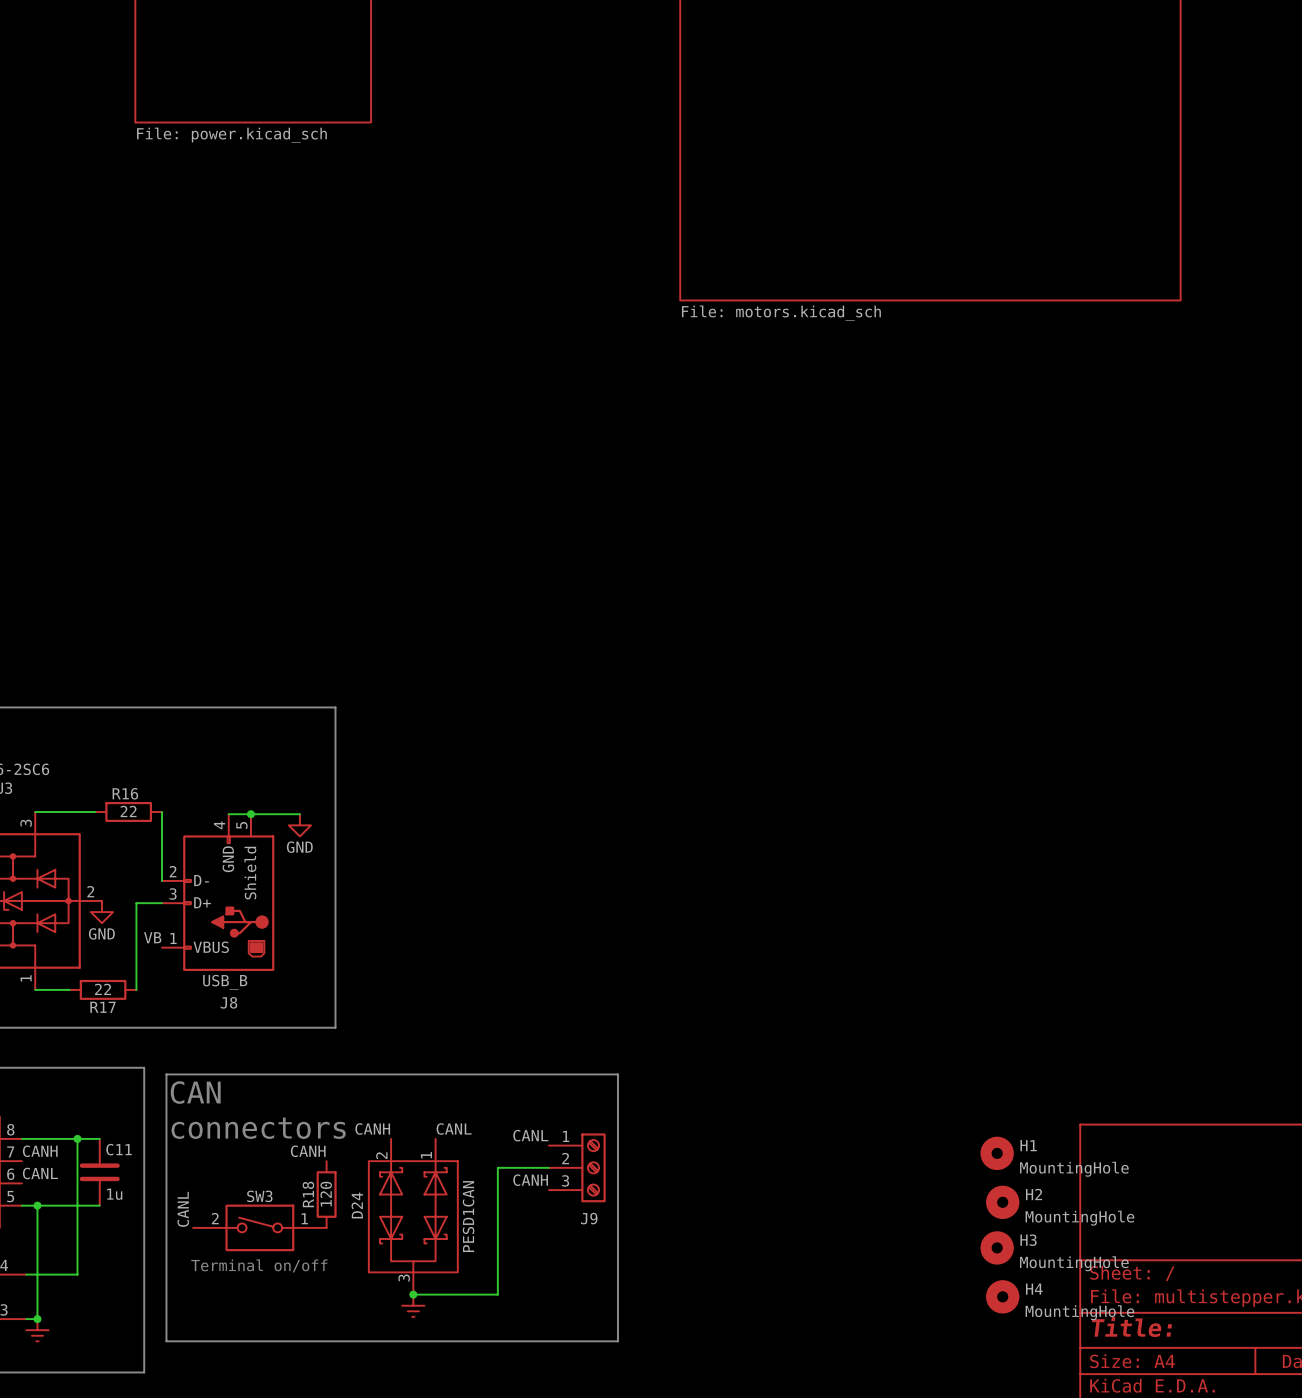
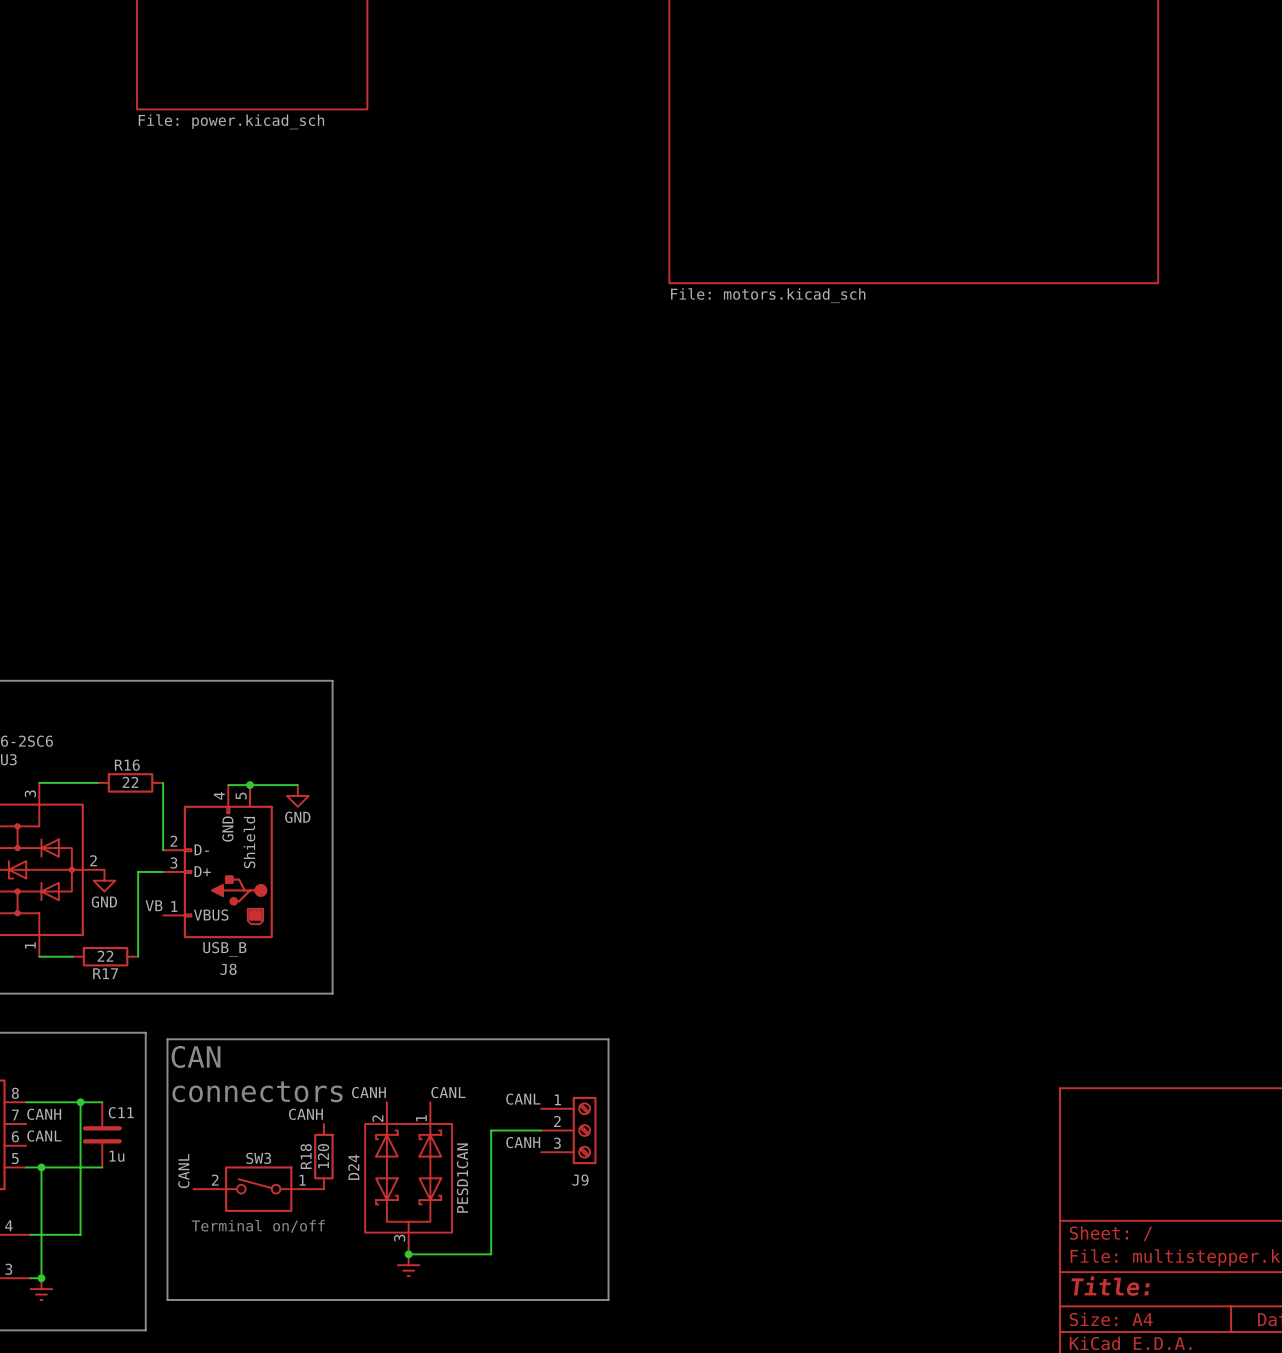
H1: MountingHole (997, 1153) -> none
H2: MountingHole (1002, 1202) -> none
H3: MountingHole (997, 1247) -> none
H4: MountingHole (1002, 1296) -> none

